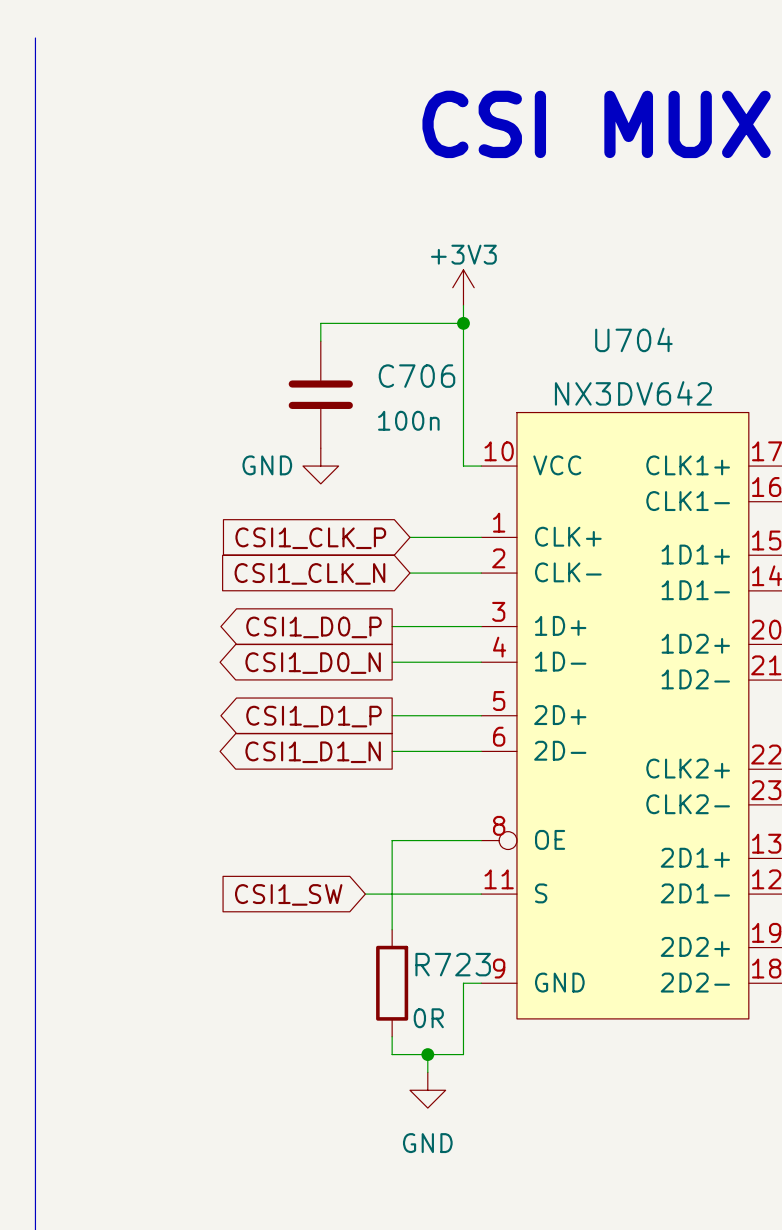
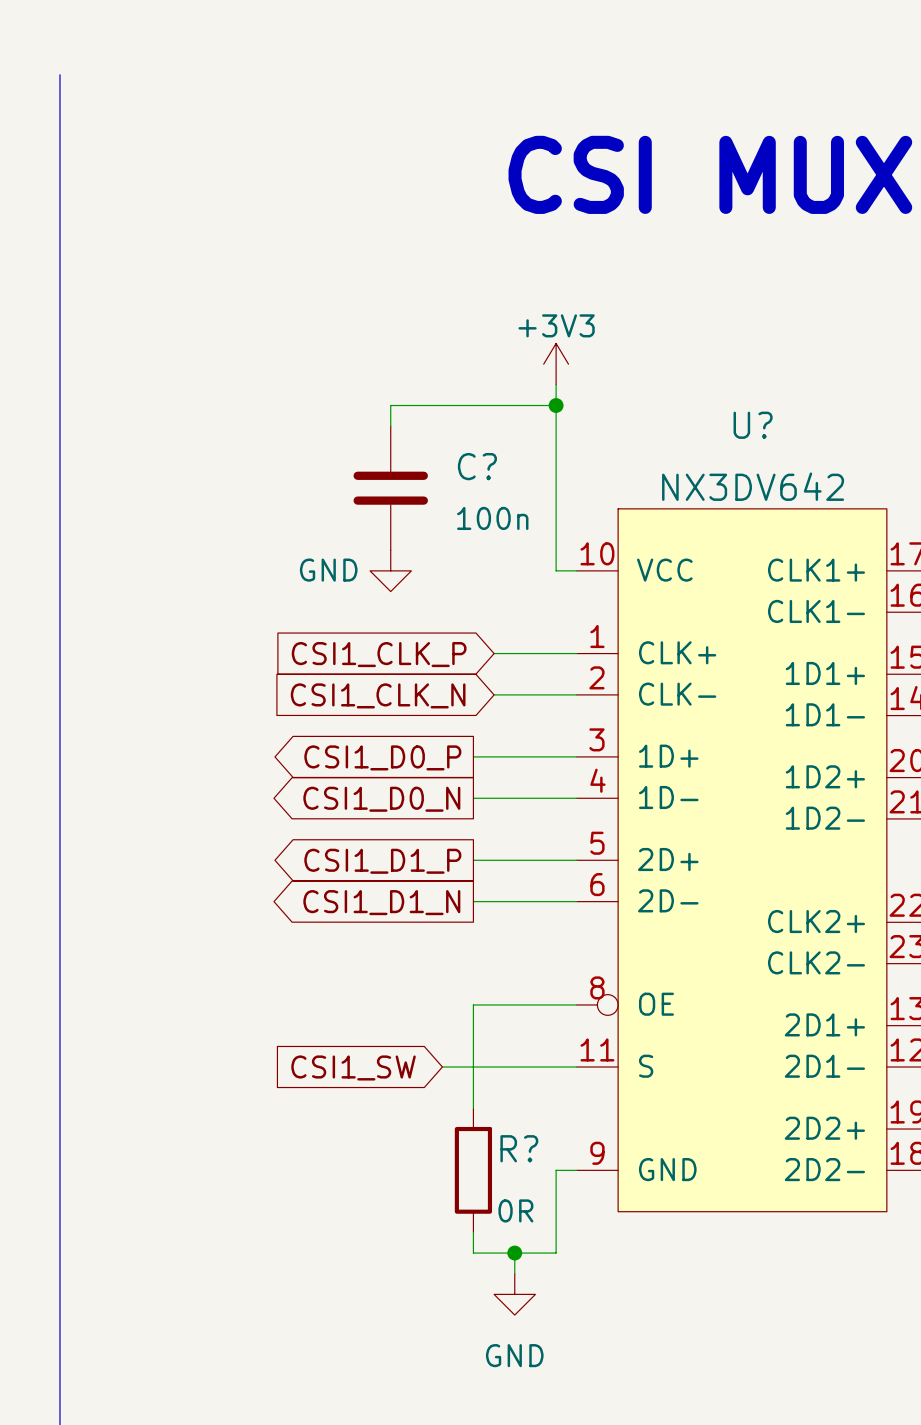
U704 name: U704 (633, 339) -> U? (753, 425)
C706 name: C706 (416, 376) -> C? (477, 466)
R723 name: R723 (453, 964) -> R? (519, 1148)

